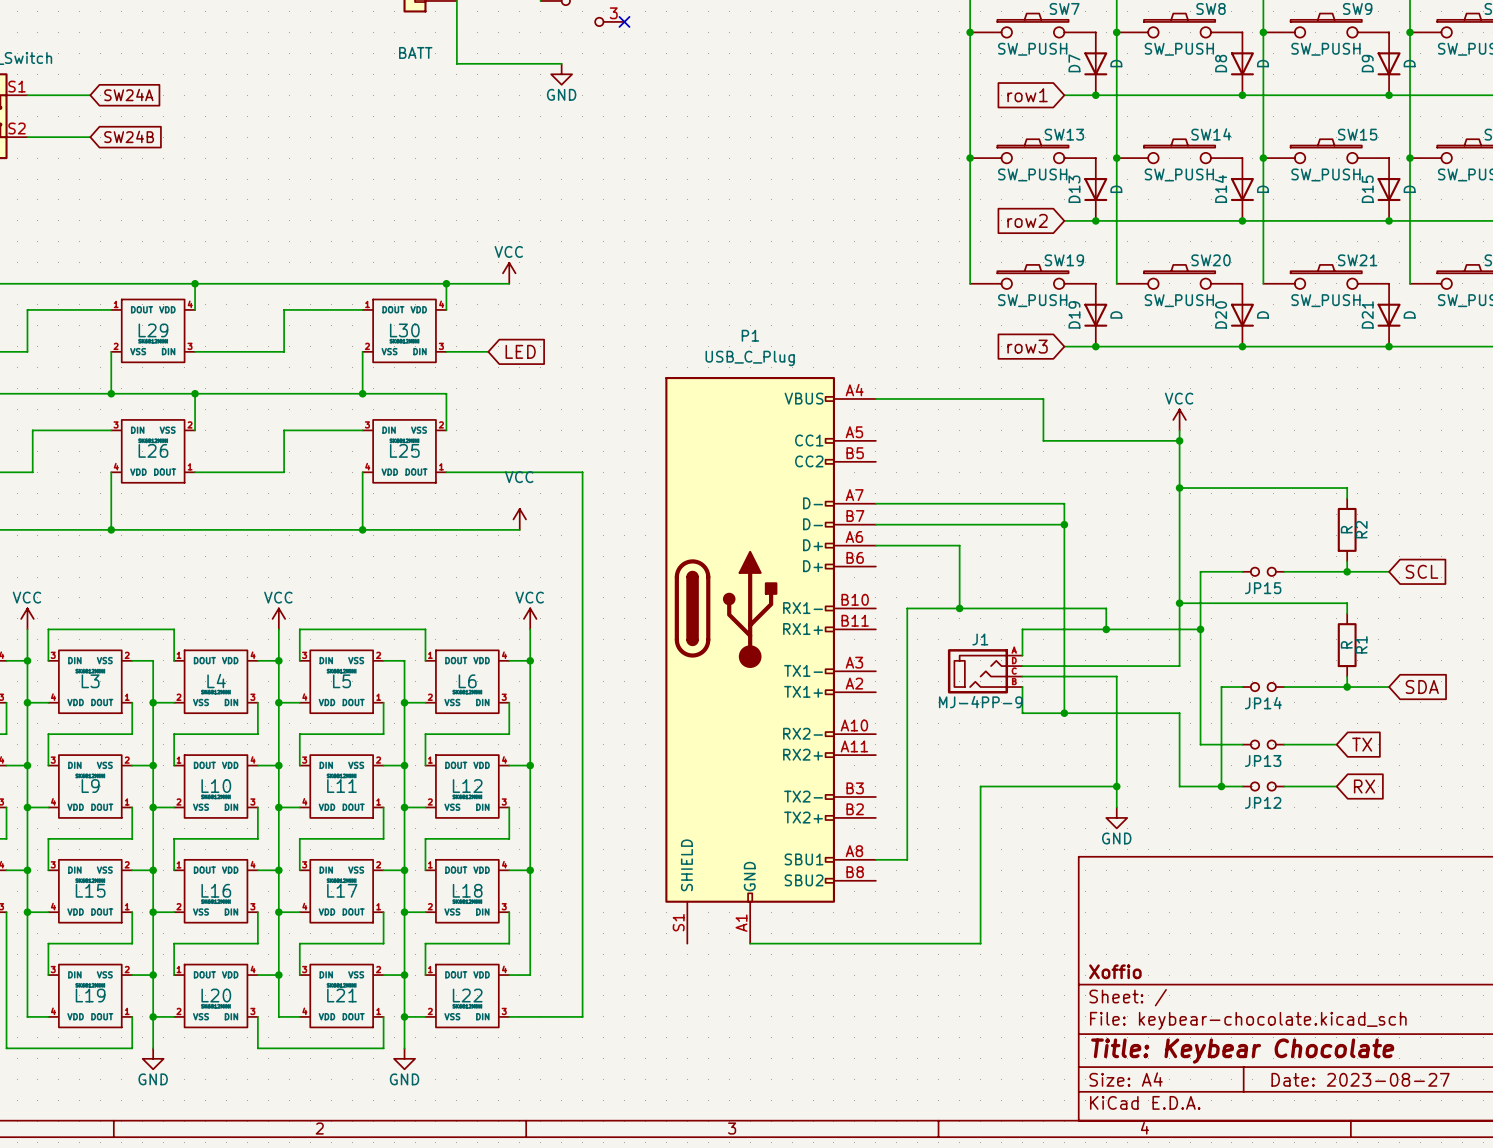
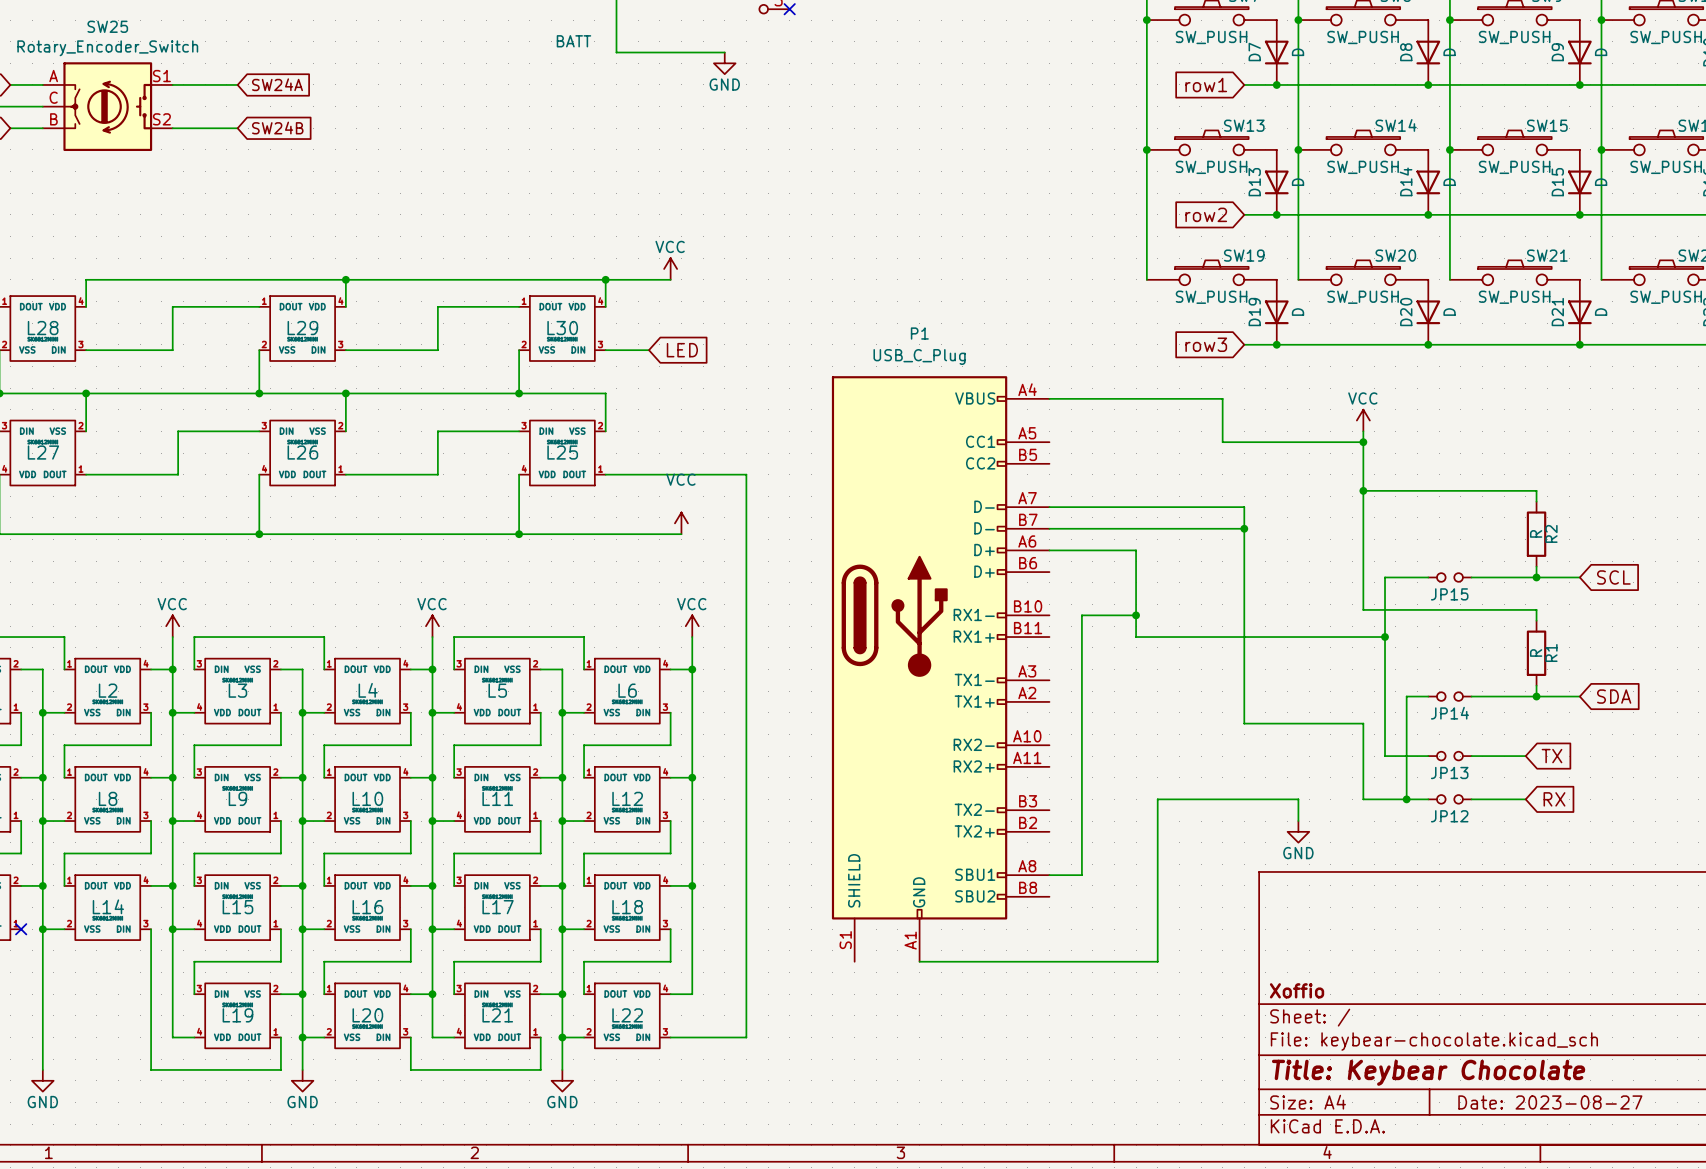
wire: (1179, 603) (1179, 666) (1022, 666) -> none
junction: (1179, 603) -> none
wire: (959, 608) (1106, 608) (1106, 629) -> none
wire: (1022, 629) (1022, 655) -> (1201, 637) (1136, 637) (1136, 615)
junction: (1106, 629) -> none
J1: MJ-4PP-9 (985, 671) -> none
wire: (1022, 676) (1116, 676) (1116, 786) -> none
wire: (1022, 687) (1022, 713) (1064, 713) -> none
junction: (1064, 713) -> none
junction: (1116, 786) -> none

